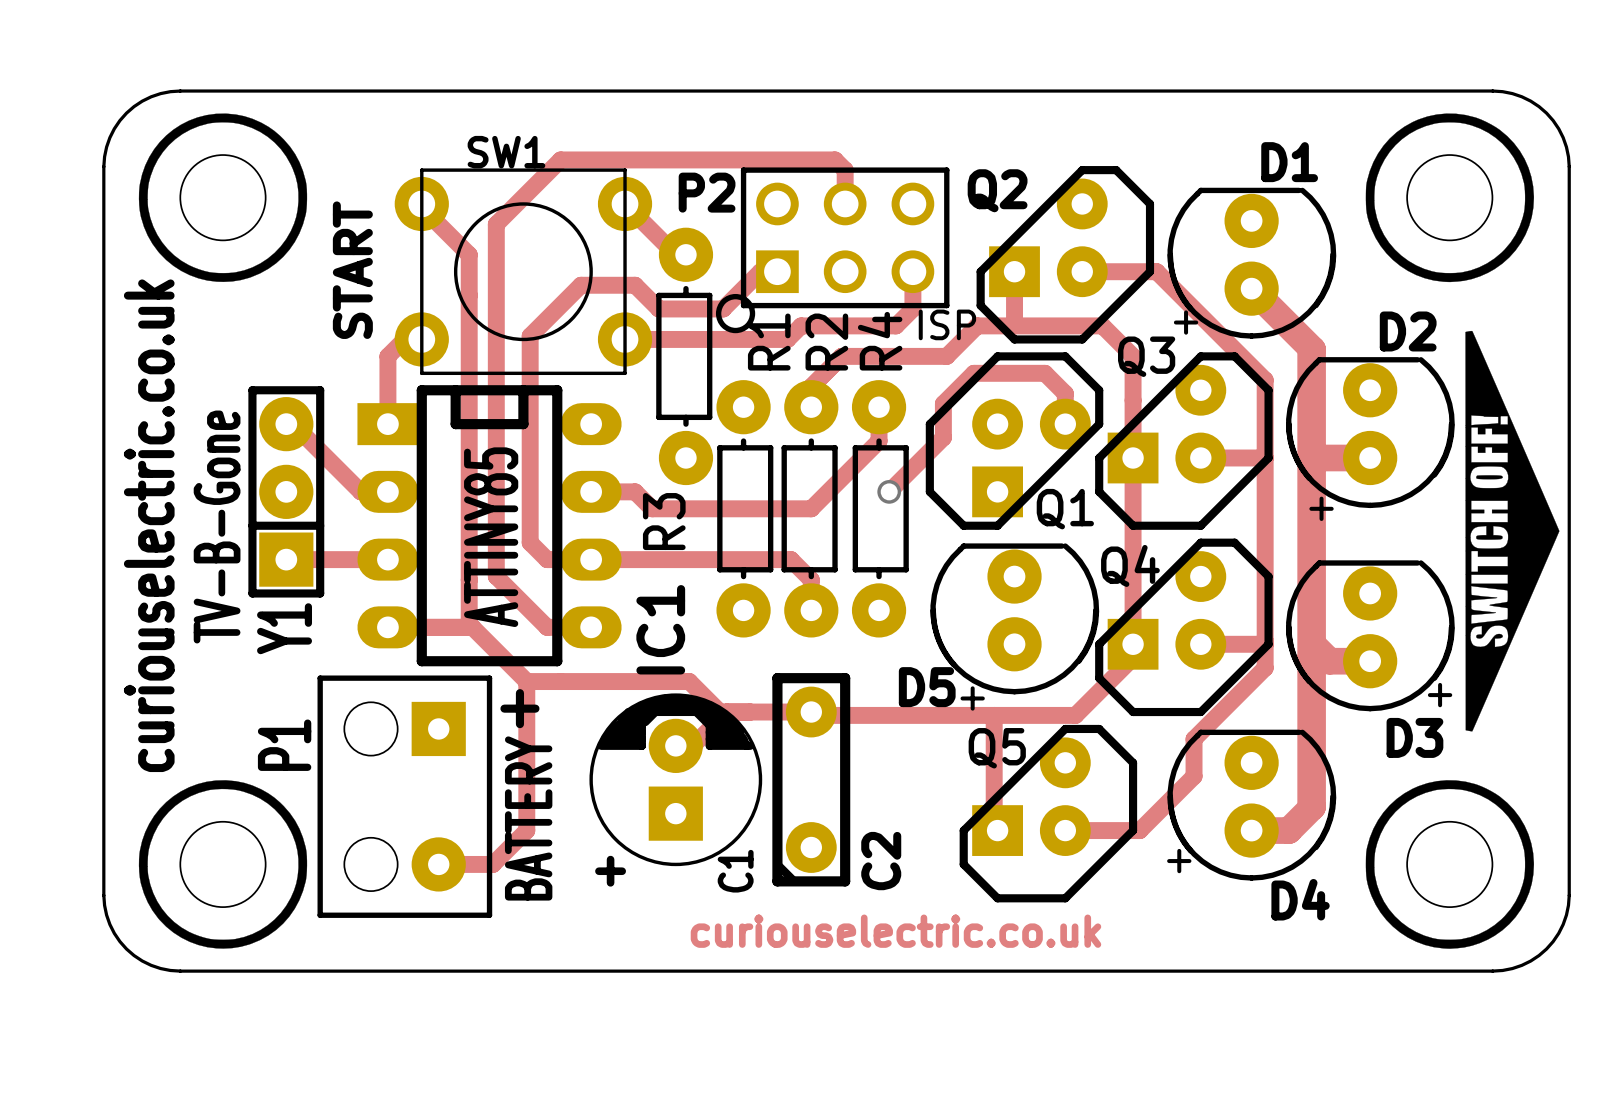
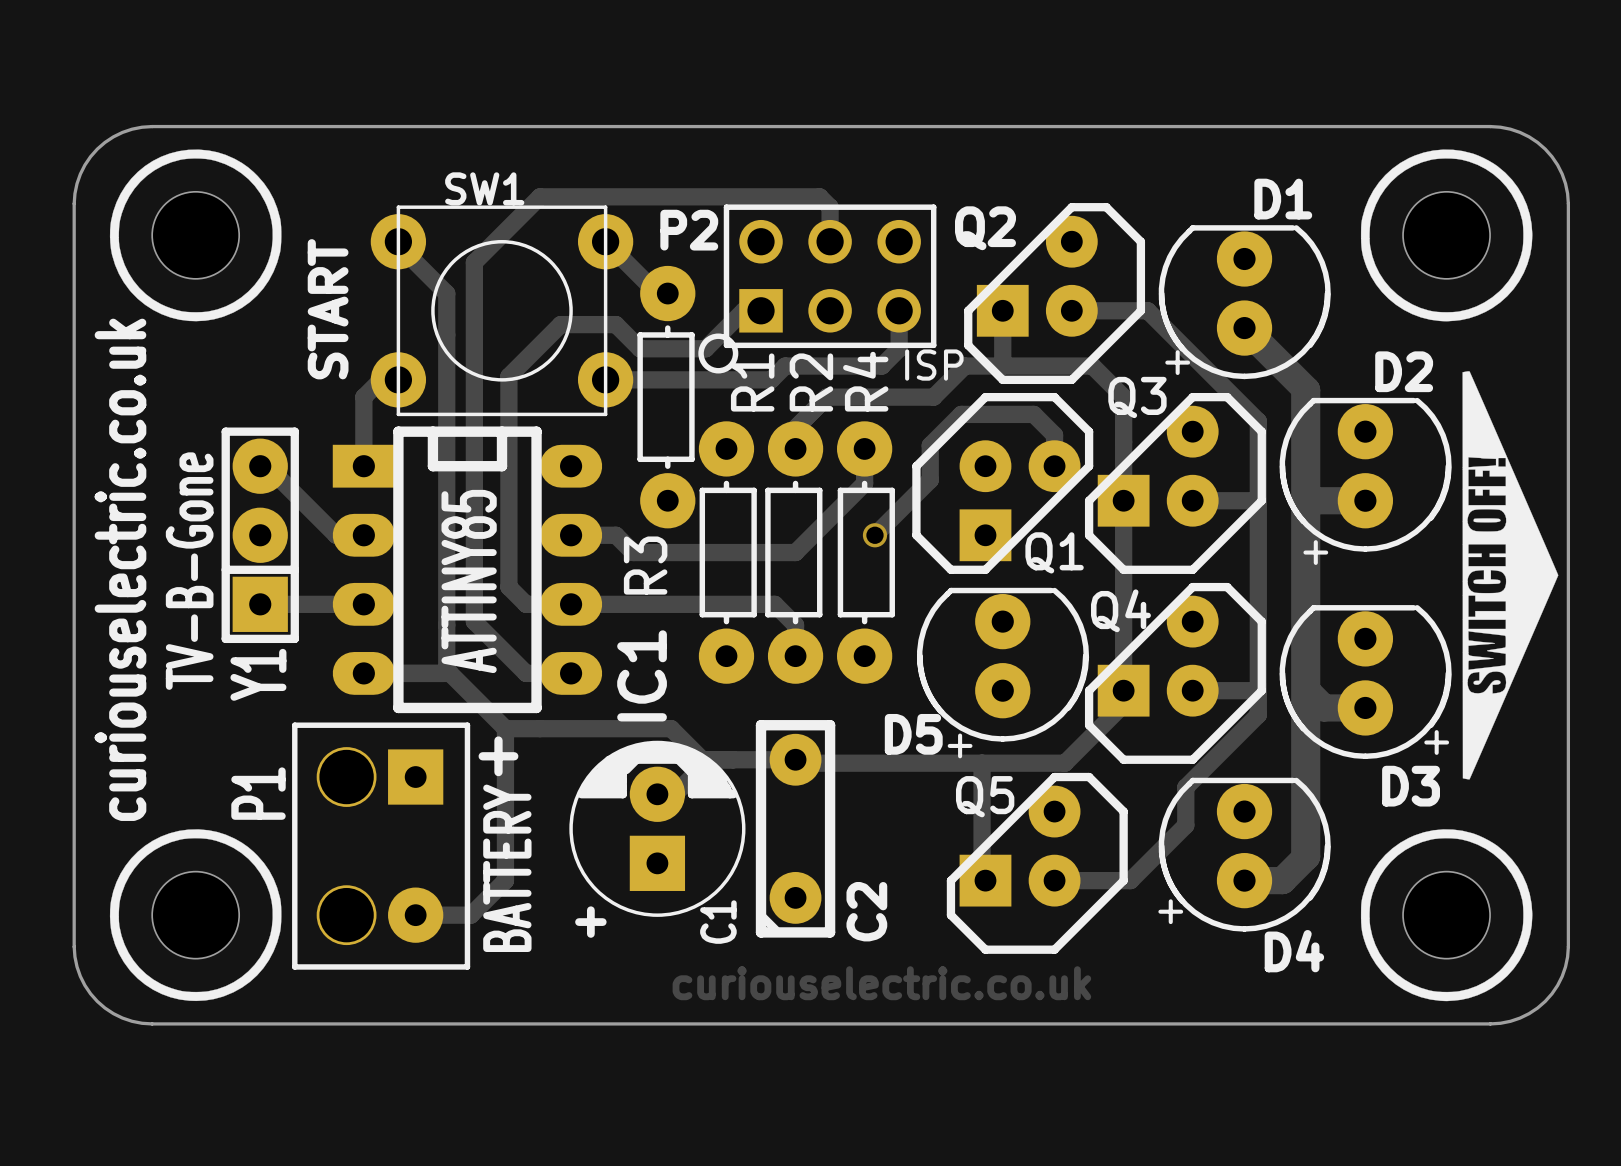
P1 footprint: [317, 675, 493, 918] -> [292, 722, 471, 970]

